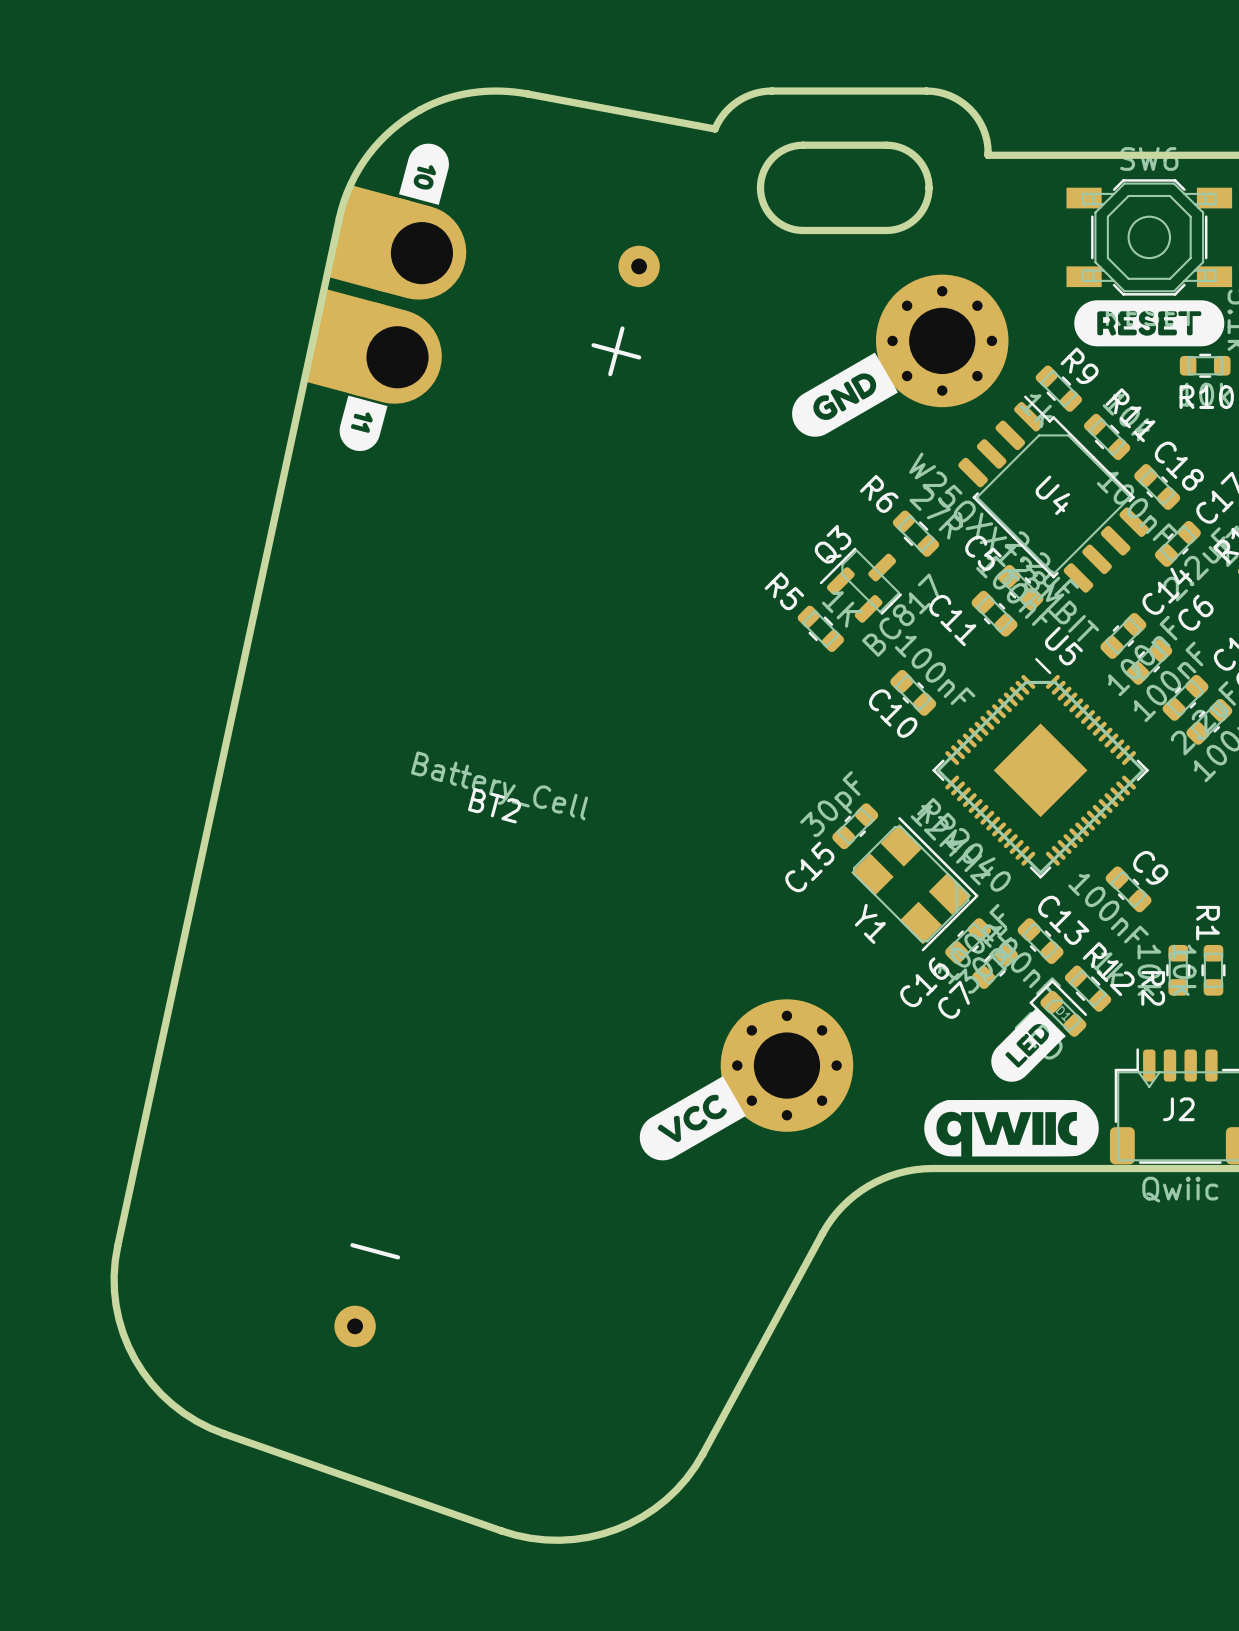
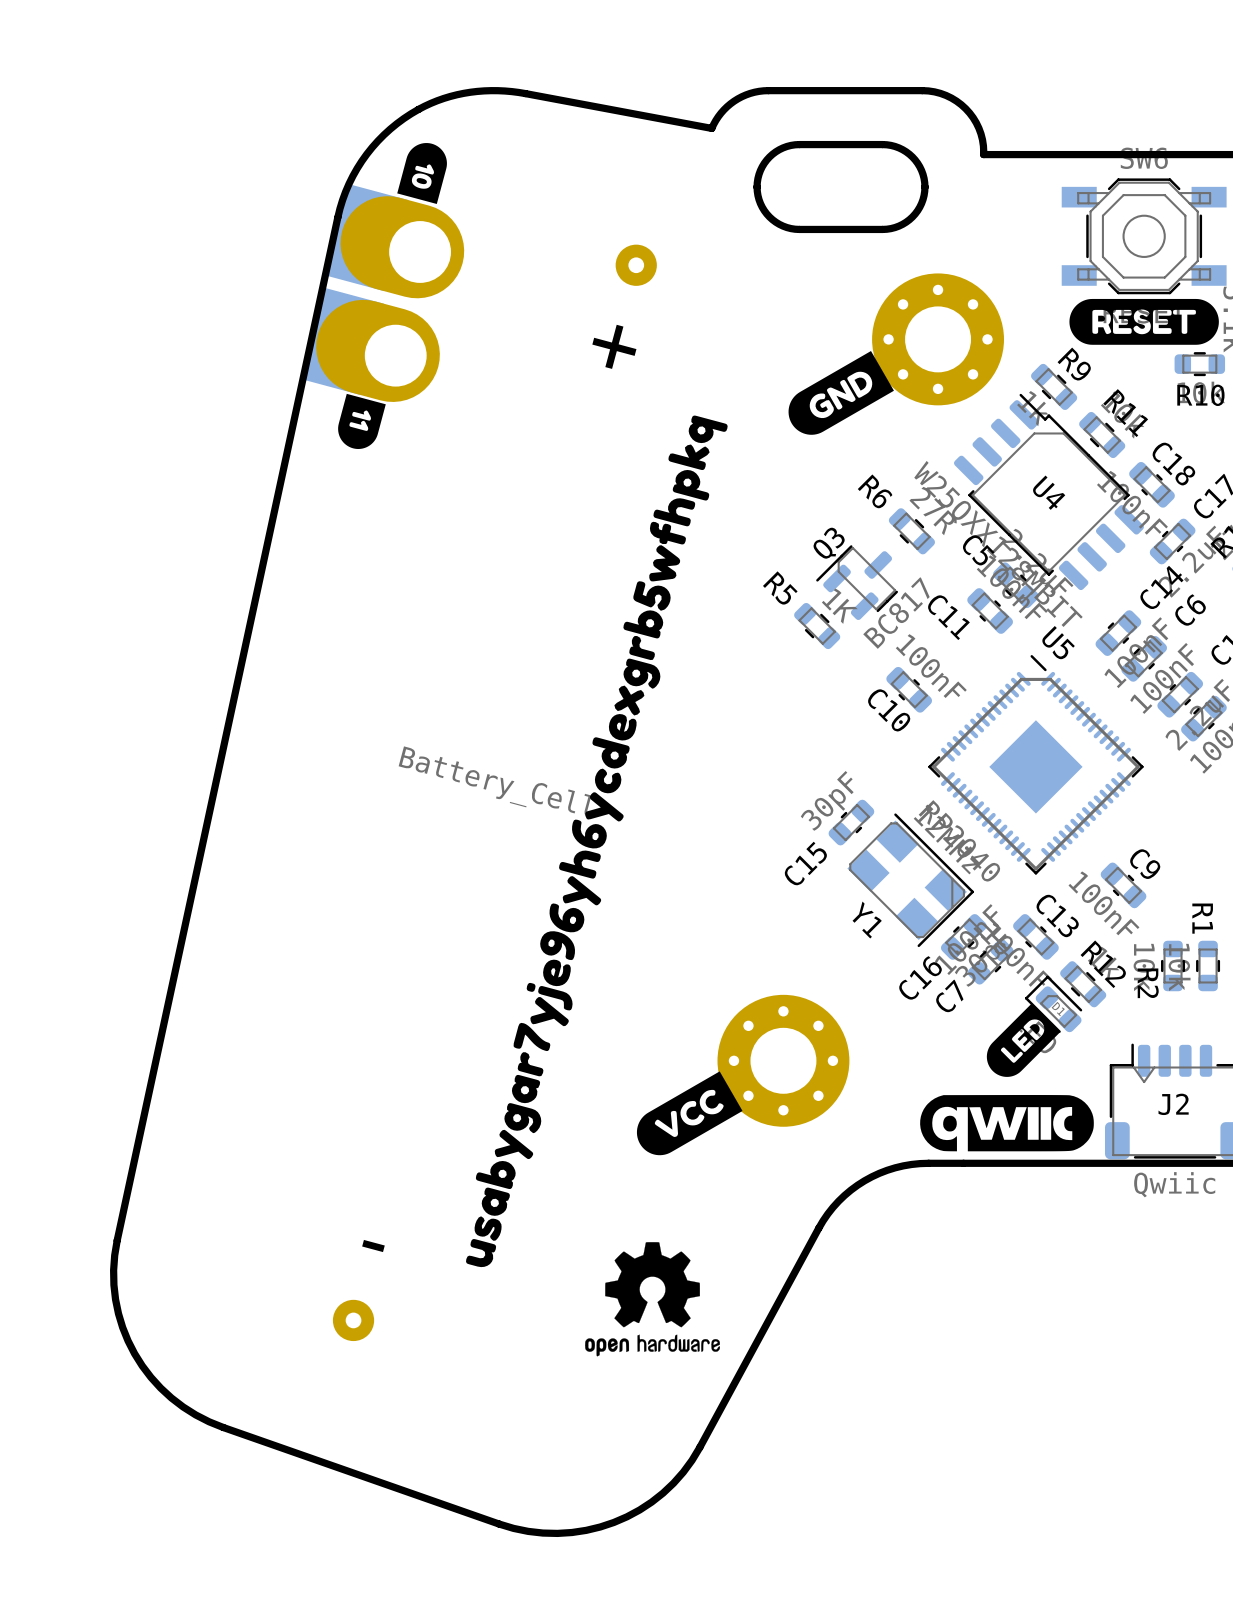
drawing: none -> [466, 415, 728, 1357]
BT2 name: BT2 (494, 805) -> none

